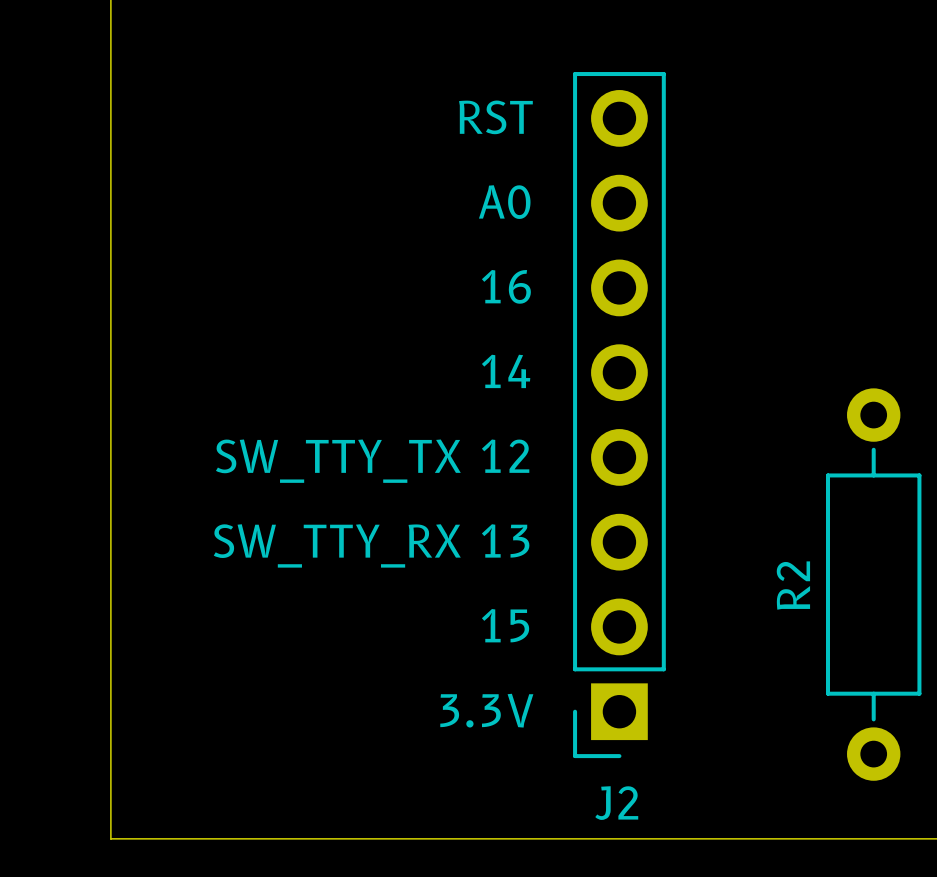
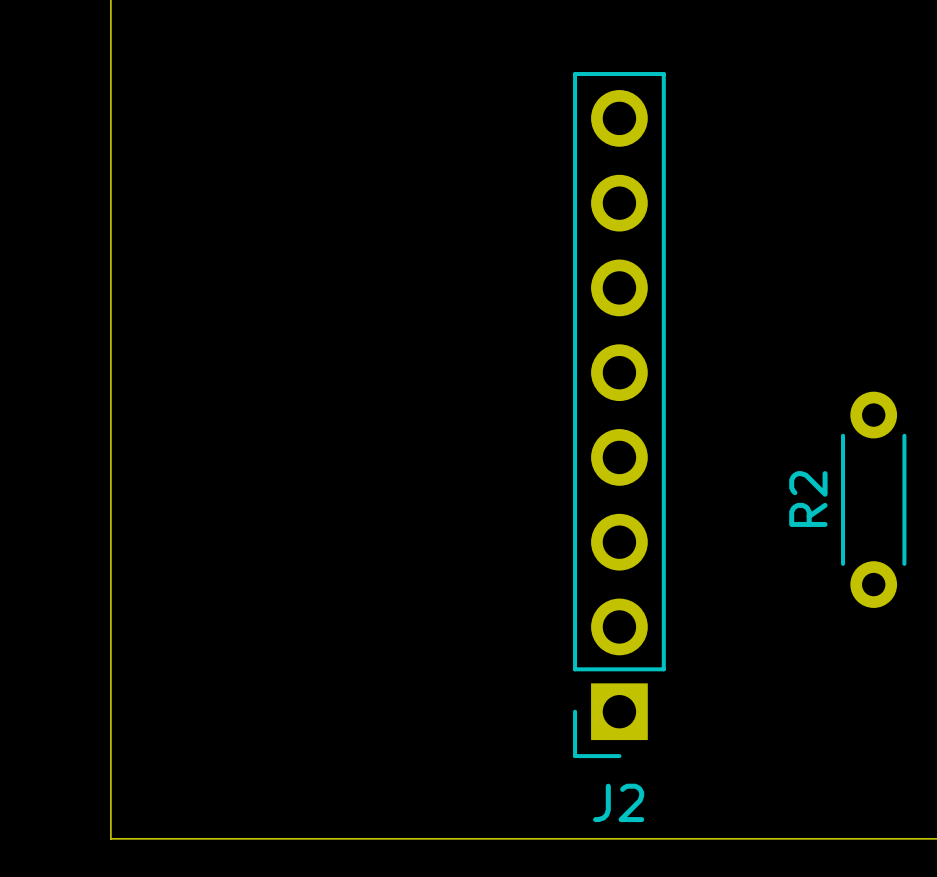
text: RST (495, 117) -> none
text: A0 (504, 202) -> none
text: 16 (506, 286) -> none
text: 14 (506, 371) -> none
R2 footprint: [825, 388, 922, 781] -> [841, 391, 907, 608]
text: SW_TTY_TX 12 (372, 461) -> none
text: SW_TTY_RX 13 (371, 545) -> none
text: 15 (505, 625) -> none
text: 3.3V (486, 710) -> none

